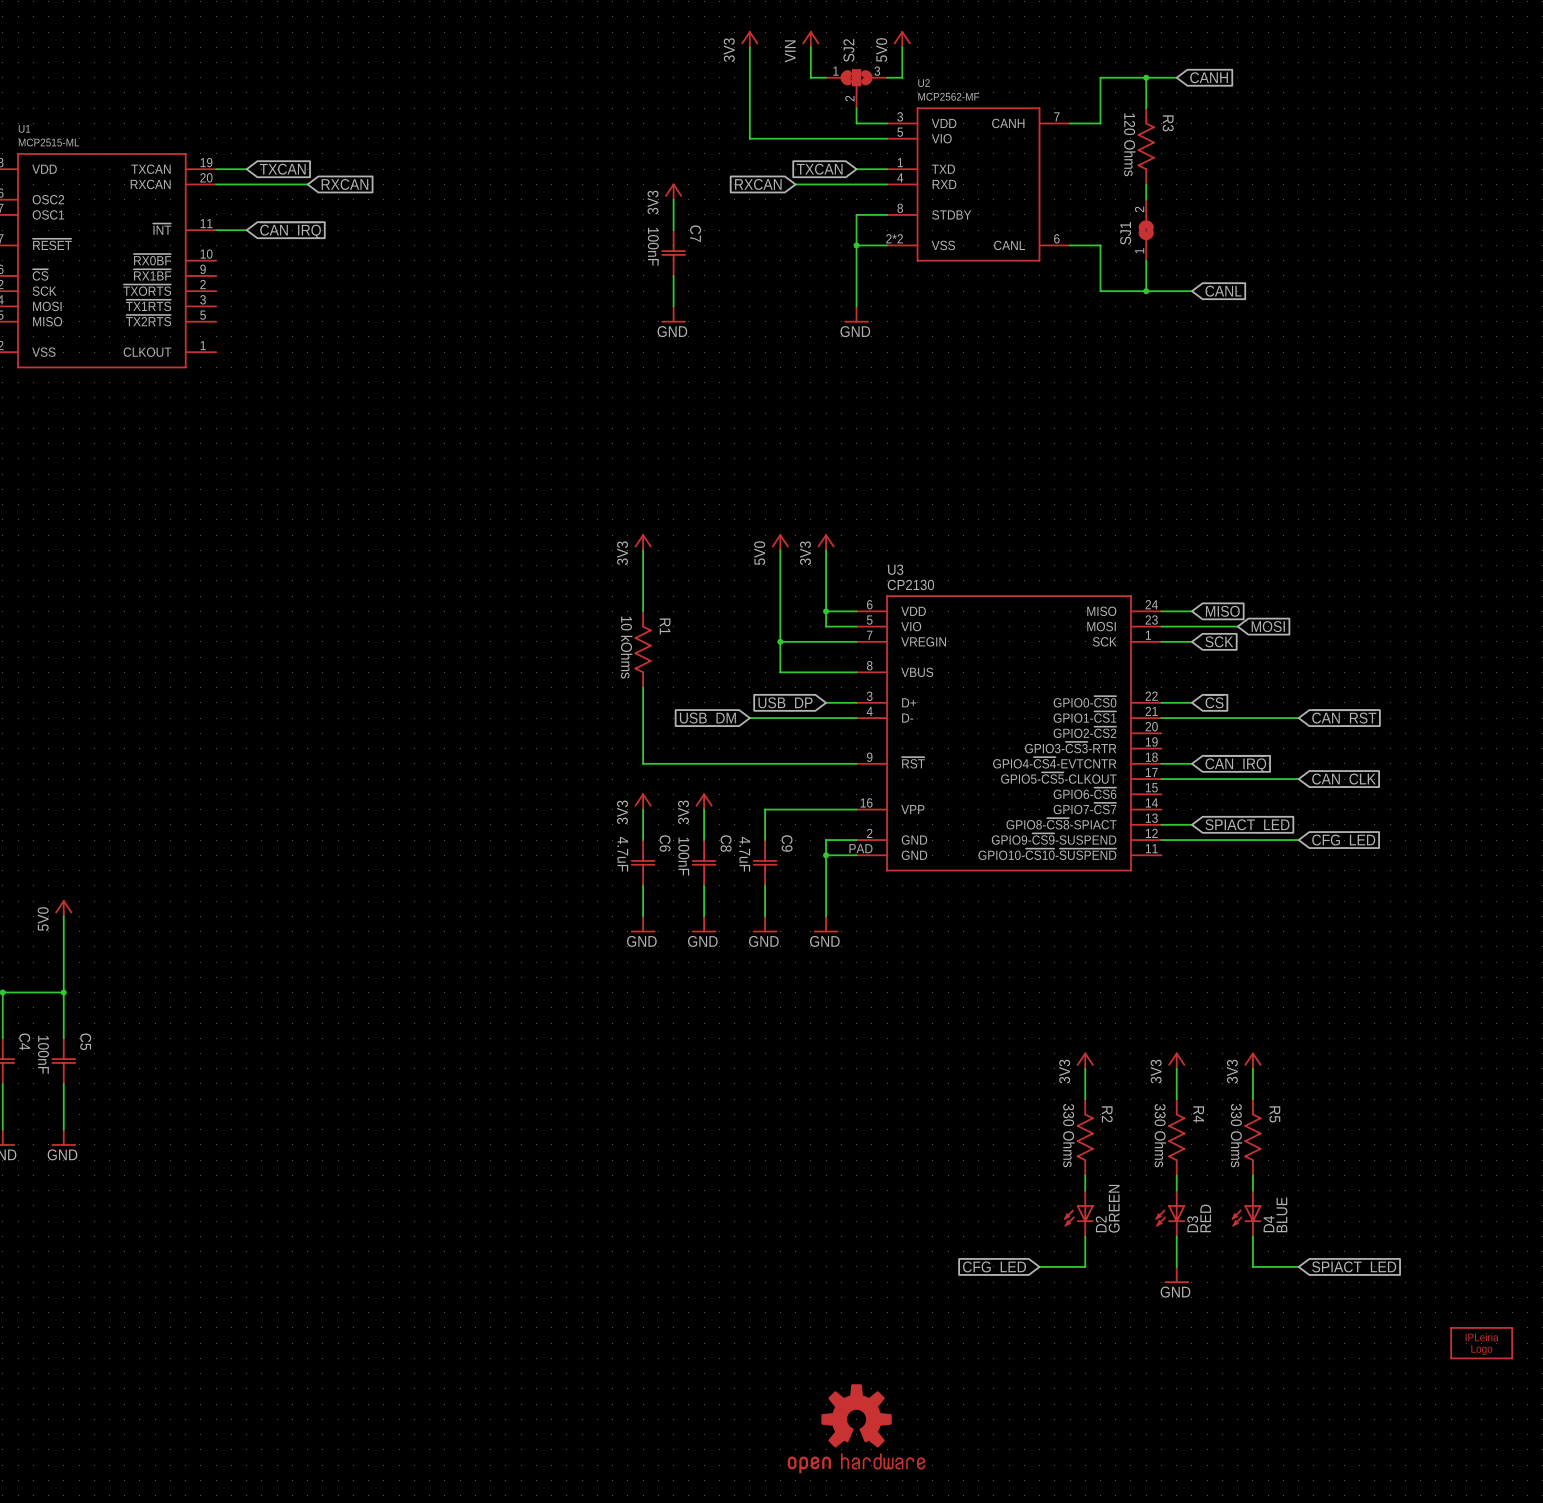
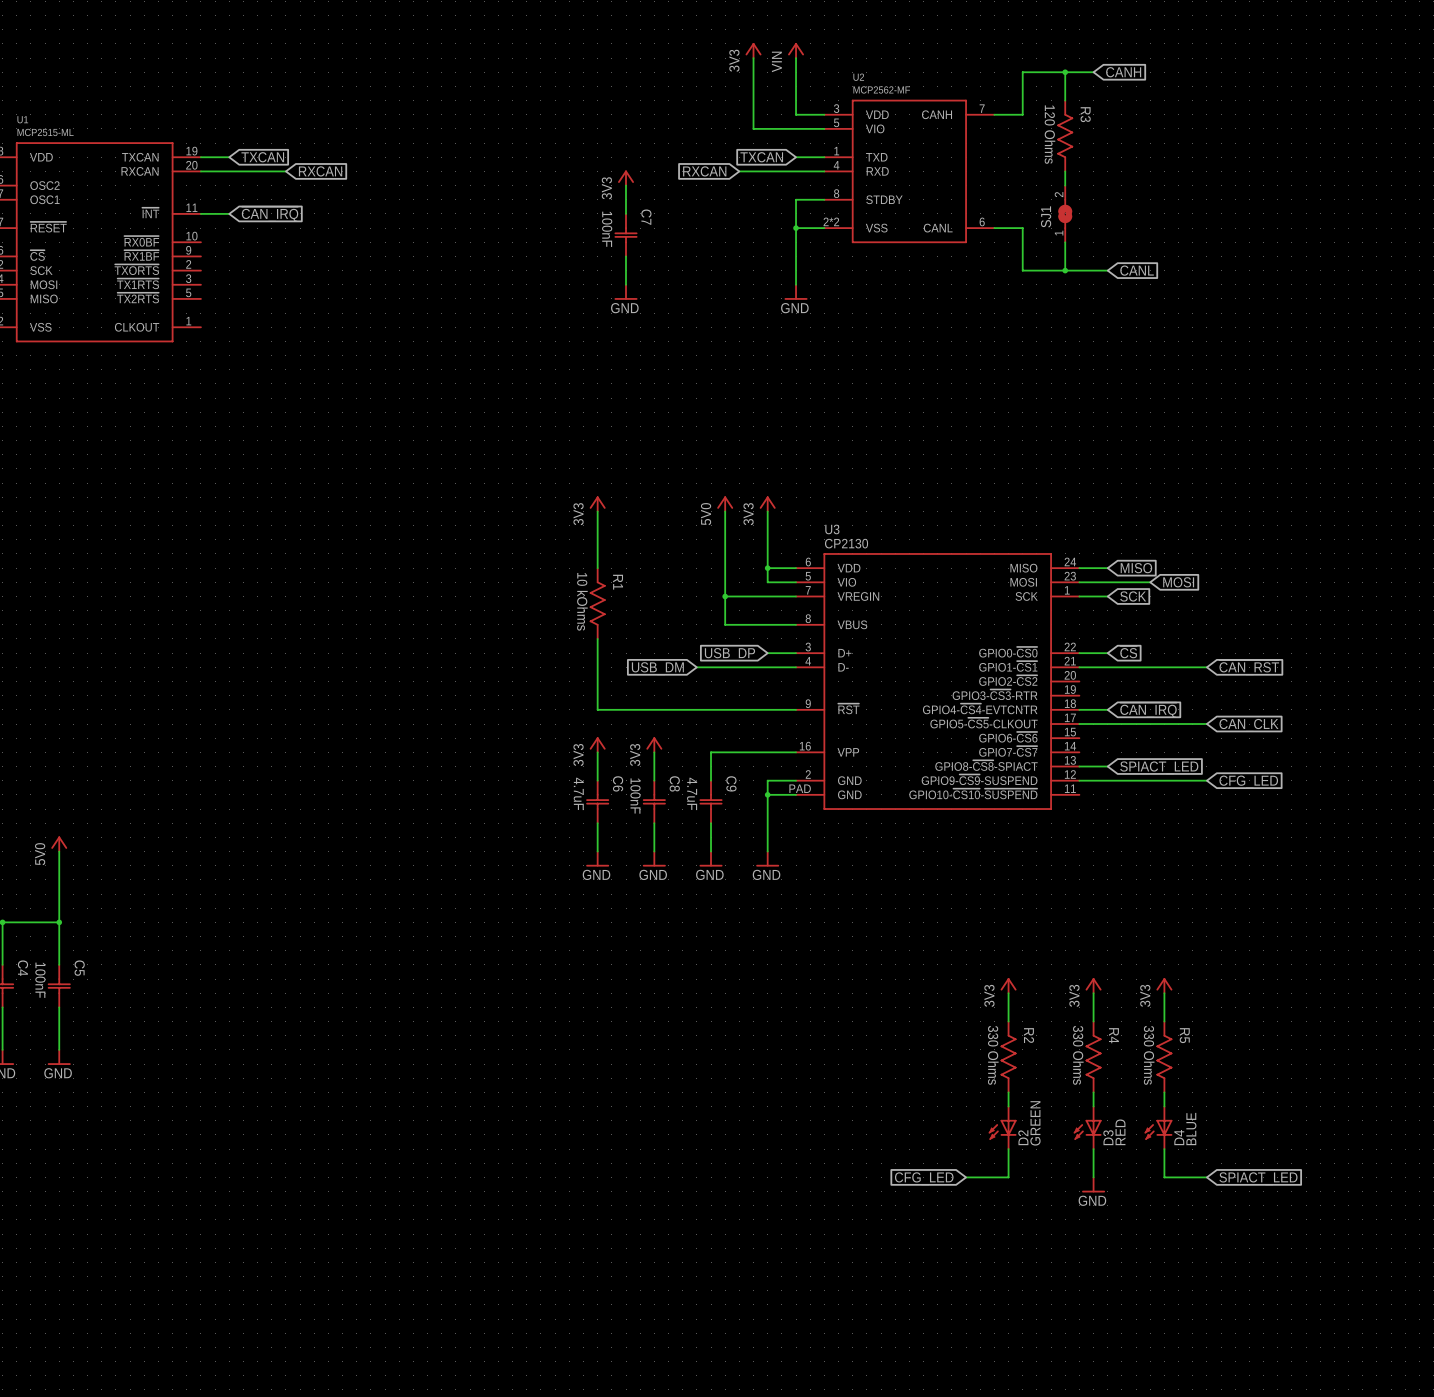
power symbol position: 3V3 (749, 39) -> 3V3 (753, 50)
power symbol position: VIN (810, 39) -> VIN (796, 50)
power symbol: 5V0 (902, 39) -> none
wire: (749, 47) (749, 138) (810, 138) -> none
wire: (902, 47) (902, 77) (887, 77) -> none
wire: (810, 77) (826, 77) -> (753, 72) (753, 128)
SJ2: (856, 88) -> none
part: (1481, 1343) -> none
part: (856, 1428) -> none

